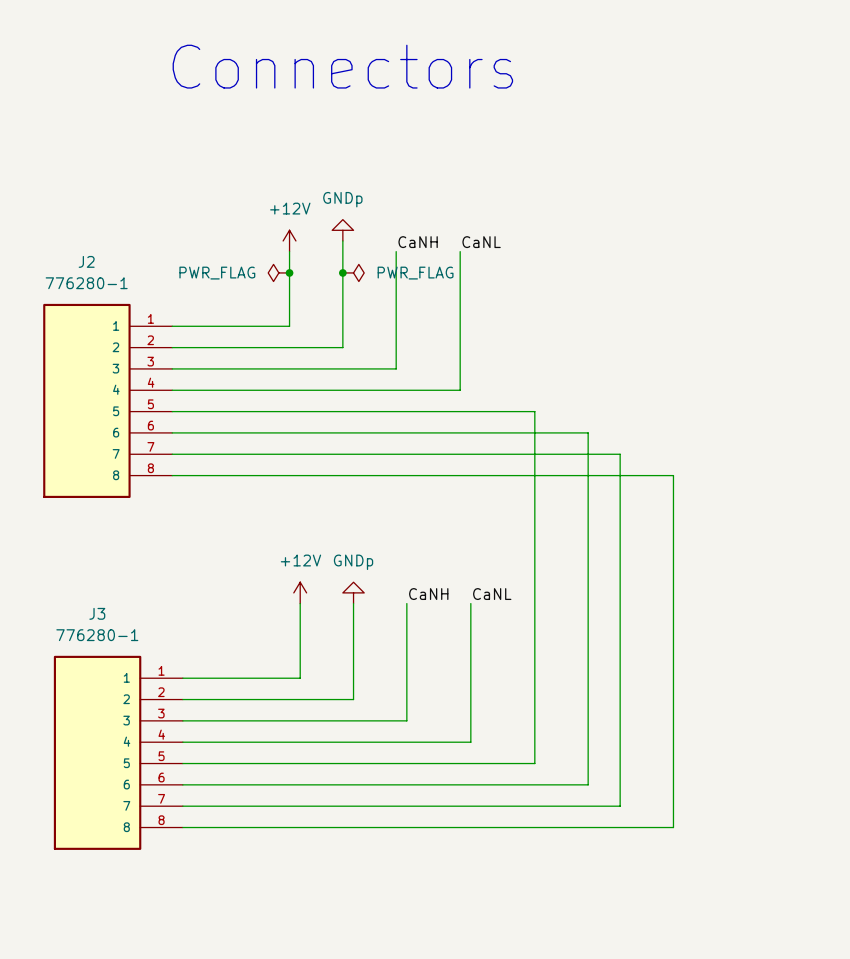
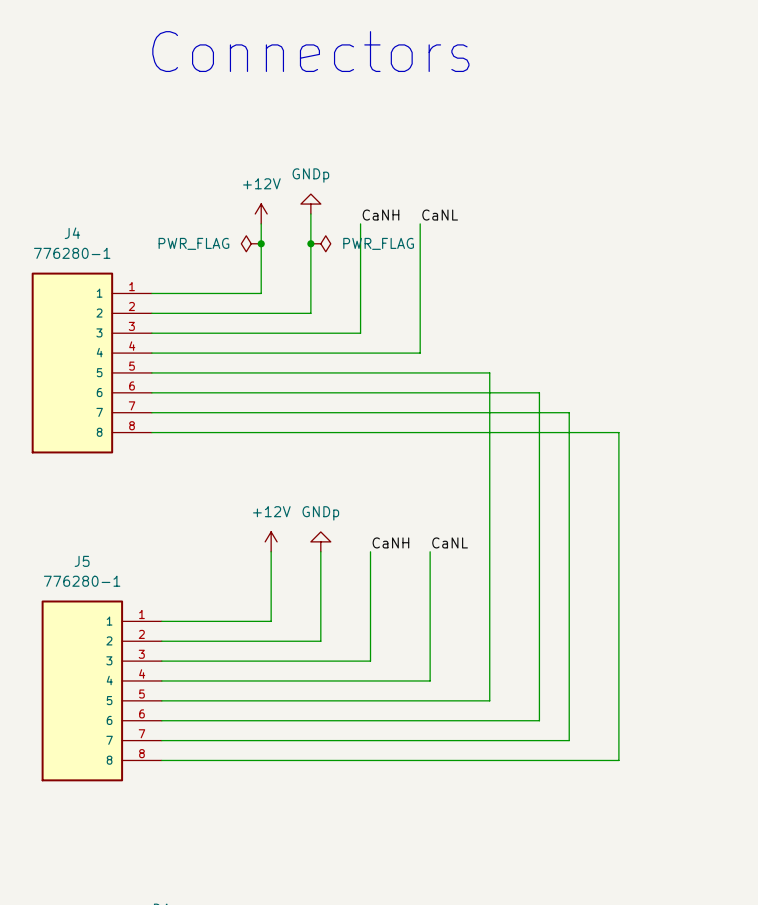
J2 name: J2 (86, 261) -> J4 (72, 233)
J3 name: J3 (97, 613) -> J5 (82, 561)

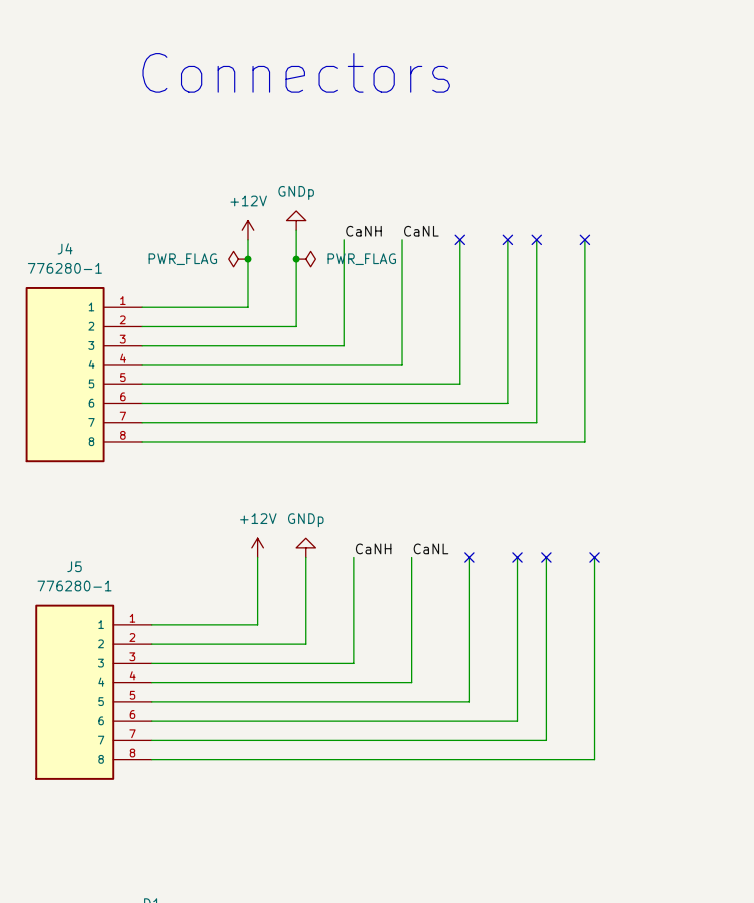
no-connect mark: none -> (459, 239)
no-connect mark: none -> (507, 239)
no-connect mark: none -> (536, 239)
no-connect mark: none -> (584, 239)
wire: (479, 372) (489, 372) (489, 551) -> (459, 384) (459, 239)
wire: (529, 392) (539, 392) (539, 551) -> (507, 403) (507, 239)
wire: (559, 412) (569, 412) (569, 551) -> (536, 422) (536, 239)
wire: (608, 432) (618, 432) (618, 551) -> (584, 441) (584, 239)
no-connect mark: none -> (469, 557)
no-connect mark: none -> (517, 557)
no-connect mark: none -> (546, 557)
no-connect mark: none -> (594, 557)

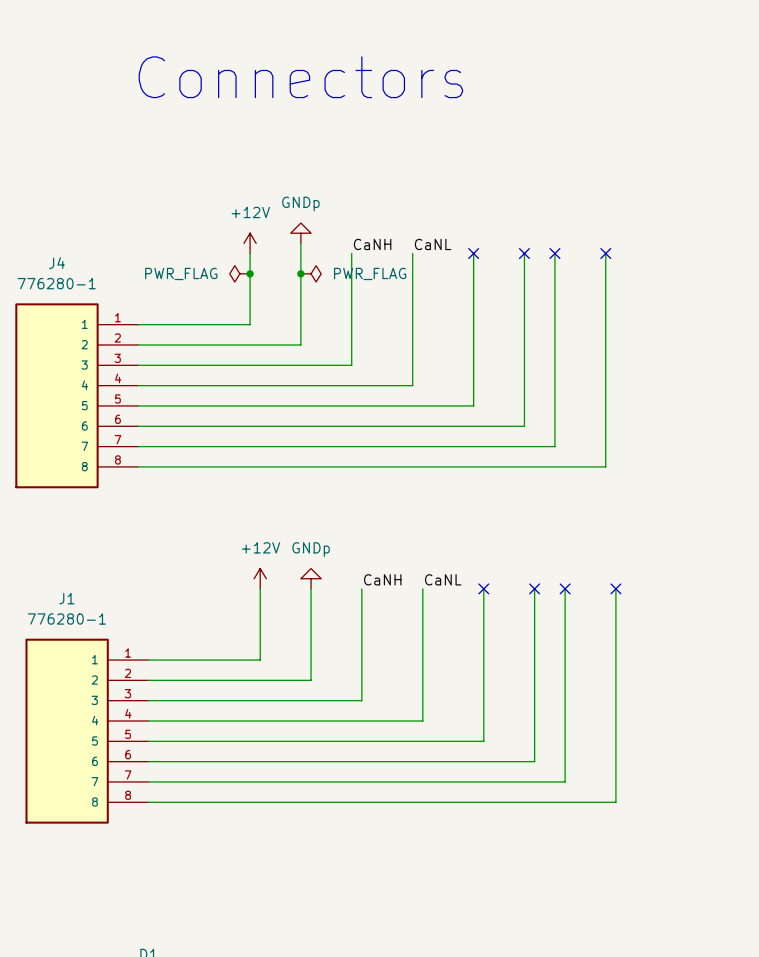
J5 name: J5 (74, 566) -> J1 (66, 598)

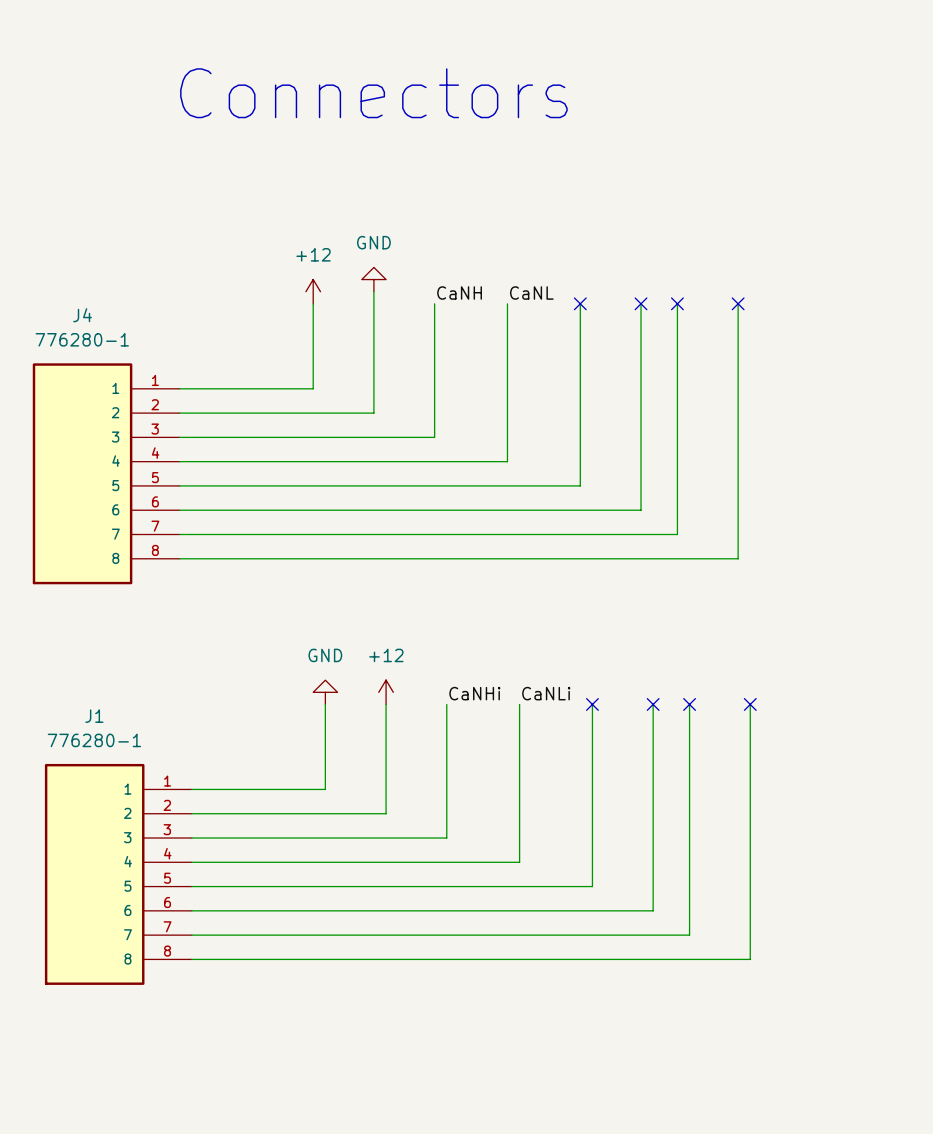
power symbol: GNDp (300, 233) -> GND (373, 279)
power symbol: +12V (250, 243) -> +12 (313, 291)
power symbol: PWR_FLAG (239, 273) -> none
junction: (250, 273) -> none
junction: (300, 273) -> none
power symbol: PWR_FLAG (311, 273) -> none
power symbol: +12V (260, 578) -> GND (325, 692)
power symbol: GNDp (311, 578) -> +12 (386, 692)
label: CaNH (382, 579) -> CaNHi (474, 693)
label: CaNL (443, 579) -> CaNLi (546, 693)

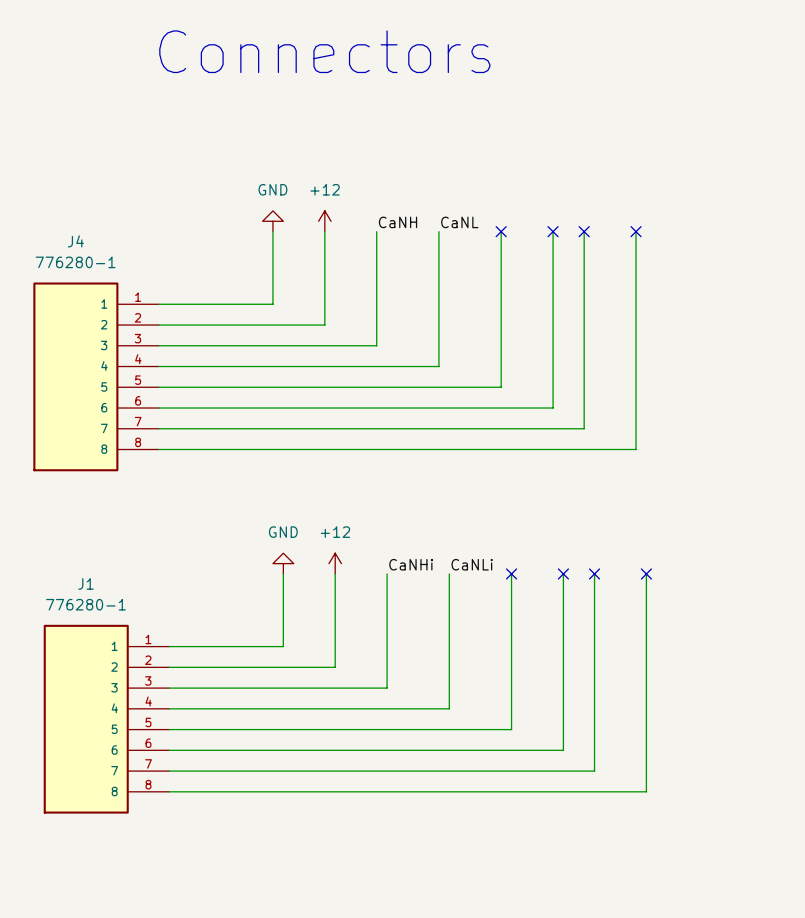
power symbol: GND (373, 279) -> none
power symbol: +12 (313, 291) -> GND (272, 221)
power symbol: none -> +12 (324, 221)

